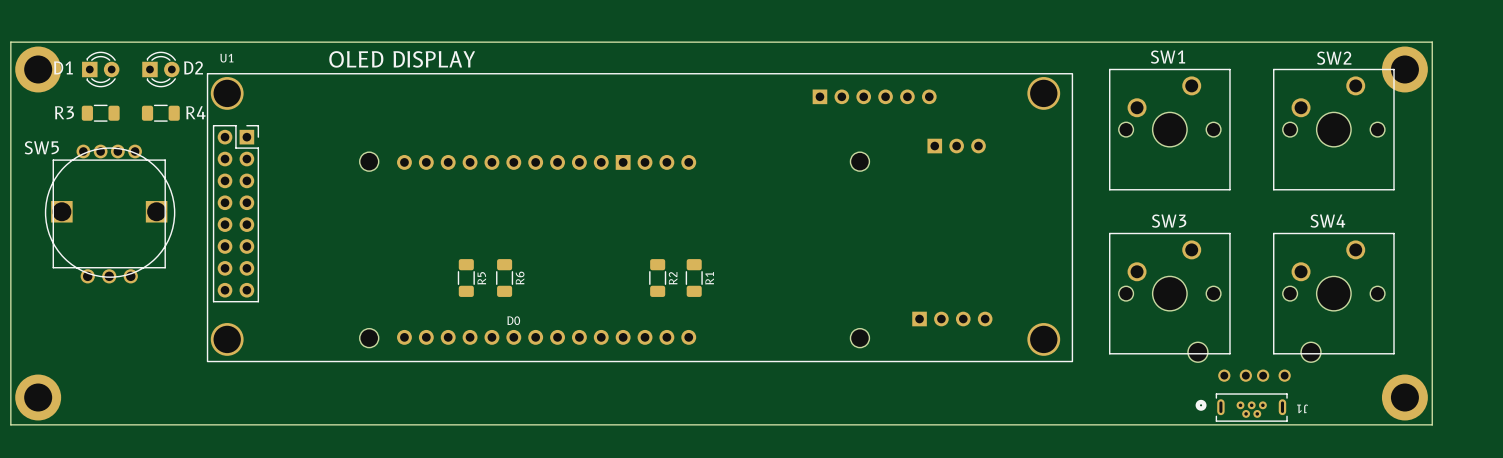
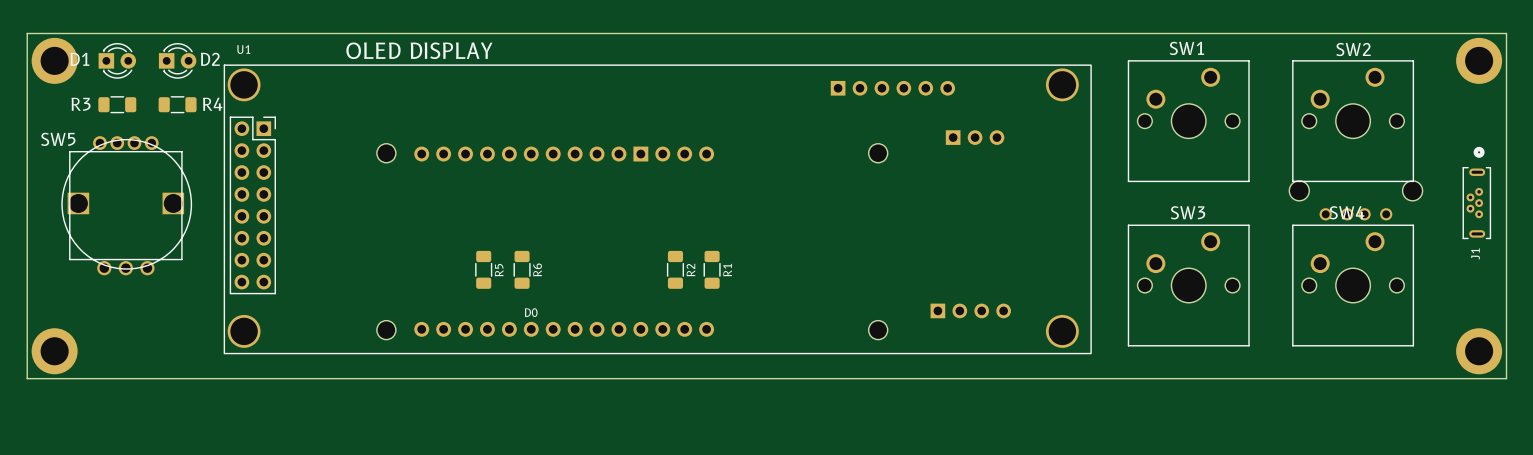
board edge: (1432, 42) (1432, 424) (10, 424) (10, 386) -> (1451, 33) (1506, 33) (1506, 378) (27, 378)
part position: (1404, 69) -> (1479, 60)
part position: (1254, 362) -> (1355, 200)
part position: (38, 397) -> (54, 351)
part position: (1404, 397) -> (1479, 351)
J1 rotation: 0° (1241, 407) -> 90° clockwise (1476, 192)
J1 position: (1241, 407) -> (1476, 192)

